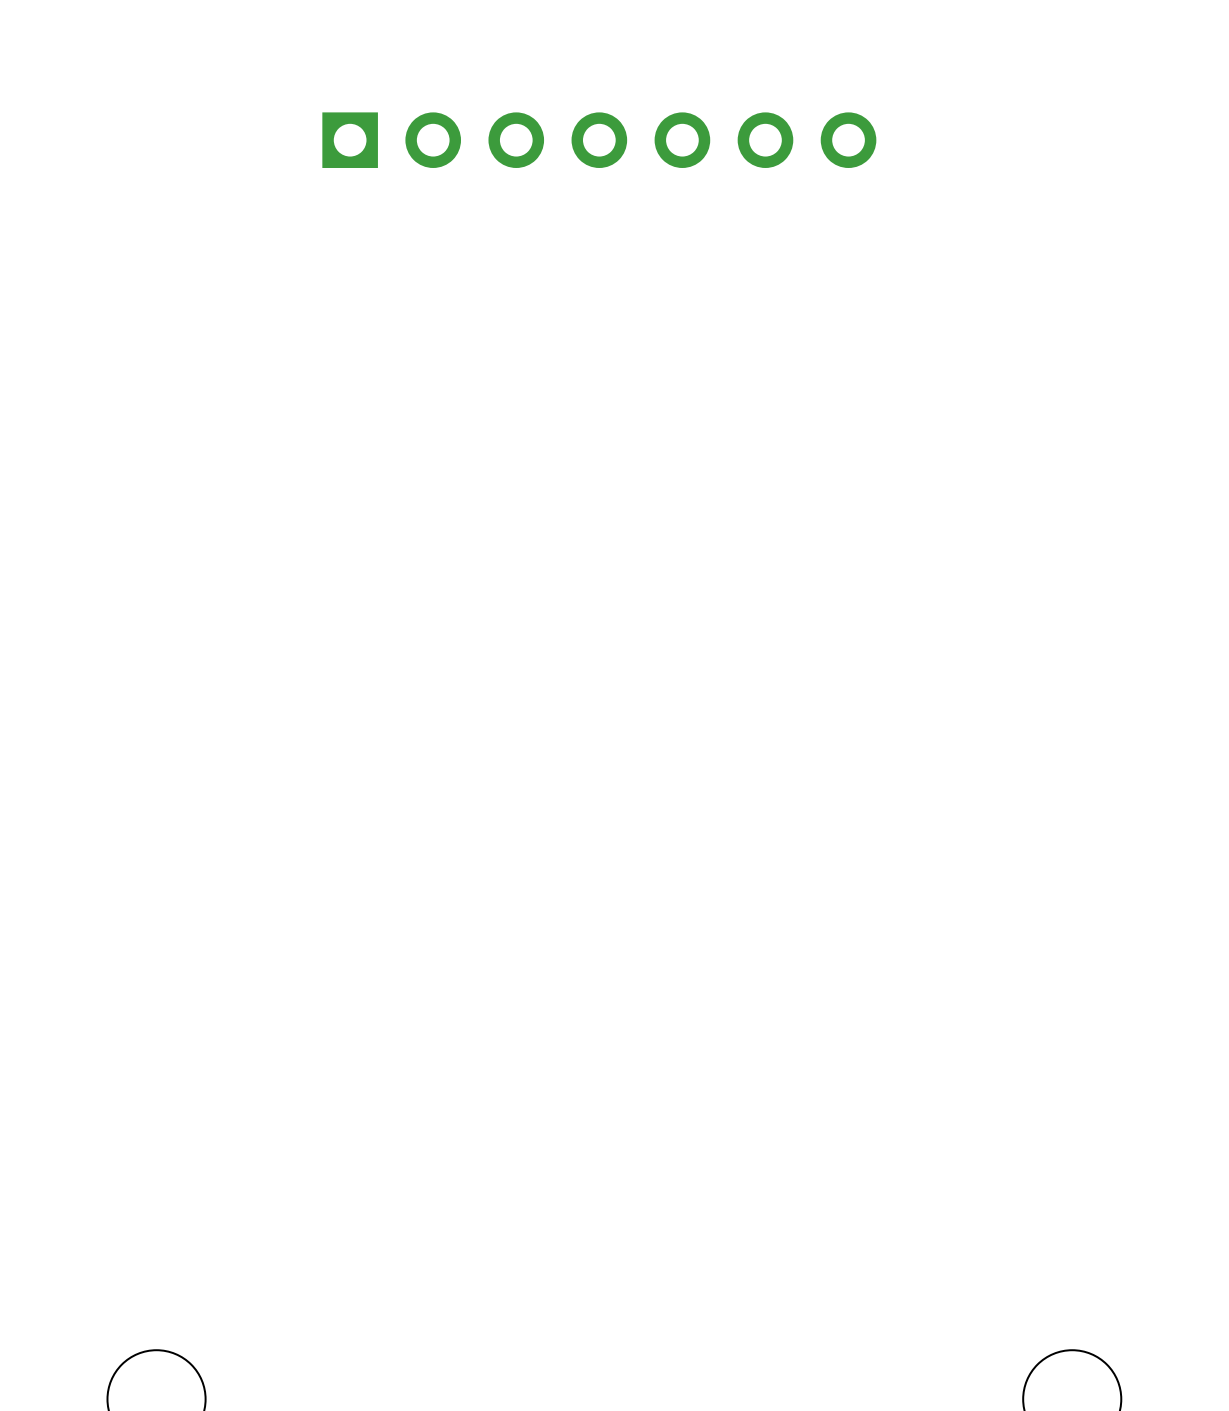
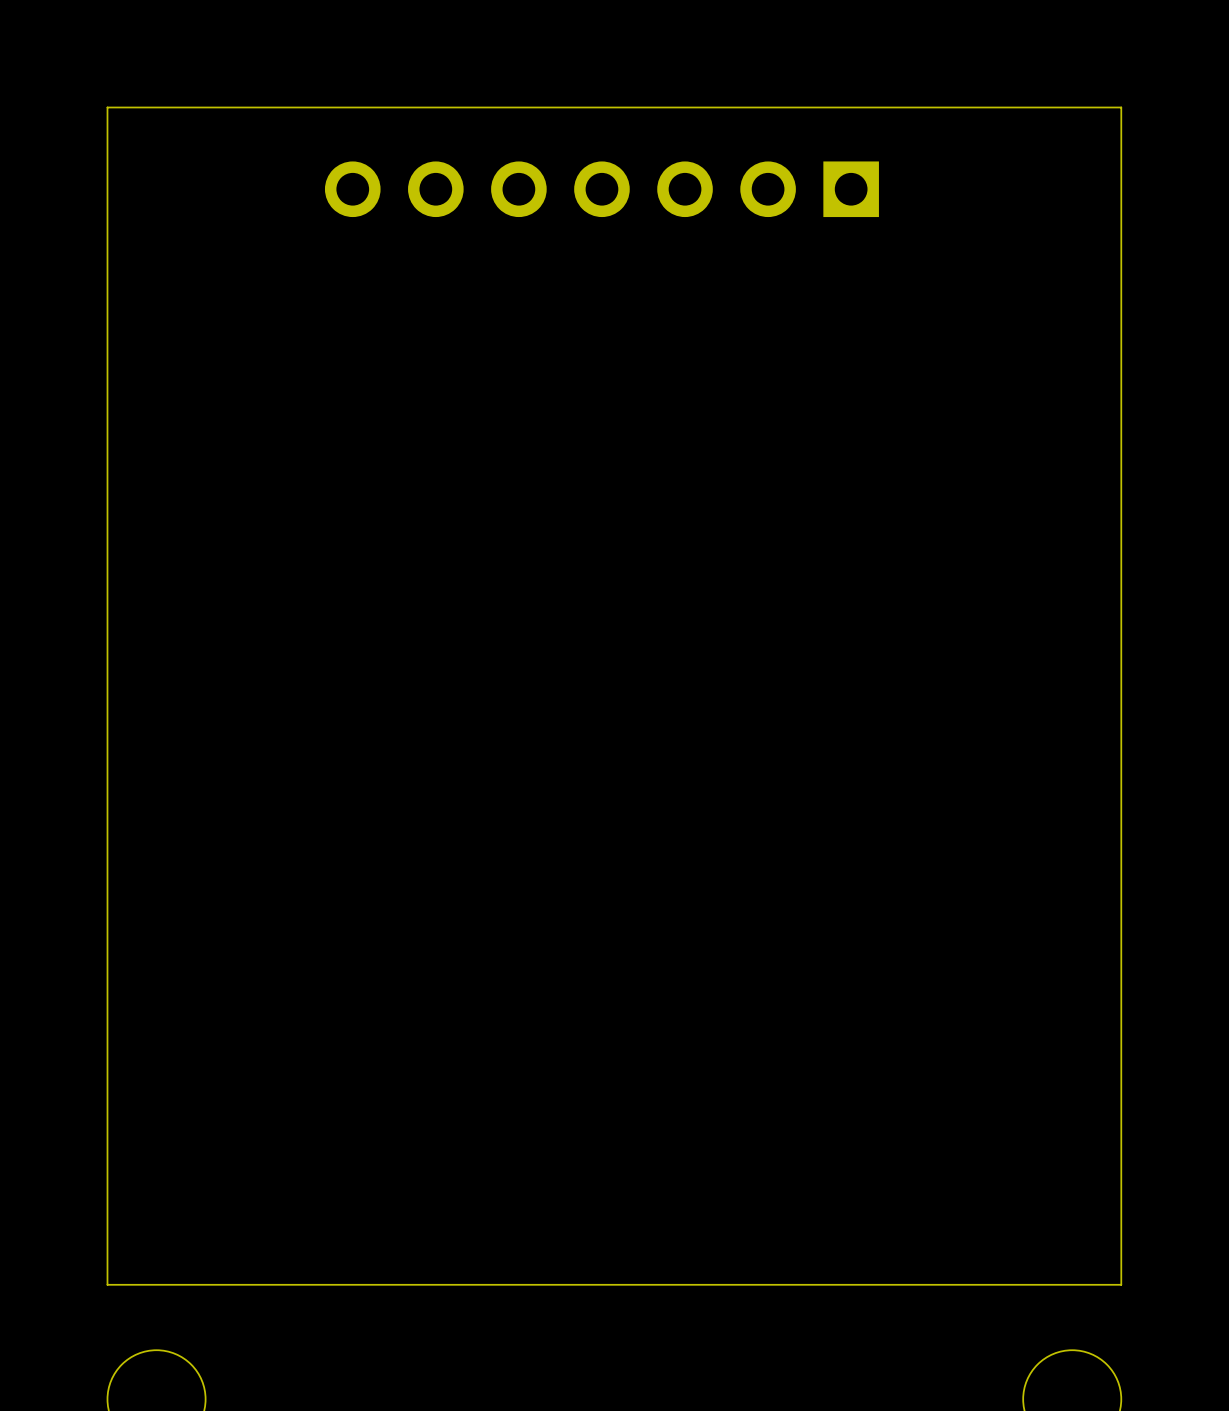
board edge: none -> (1121, 107) (107, 107) (107, 1284) (1121, 1284) (1121, 107)
part rotation: 0° (599, 140) -> 180° (601, 189)

